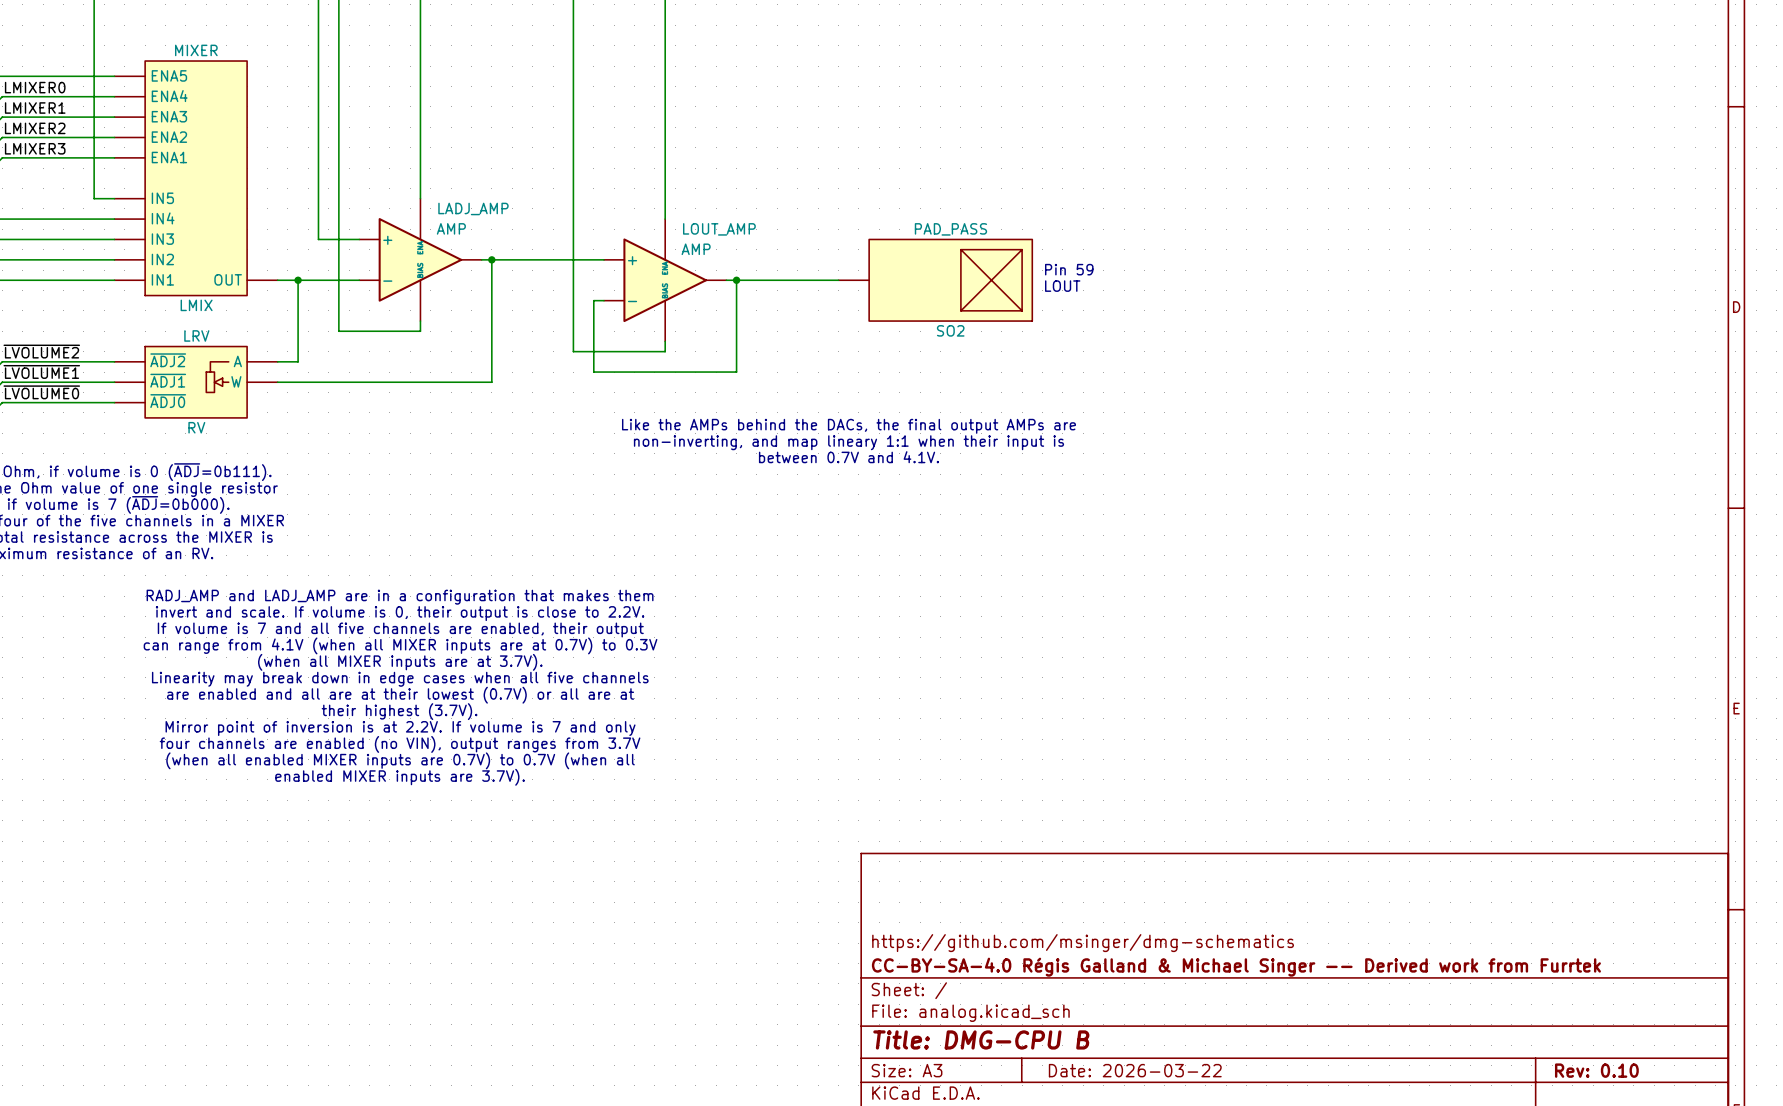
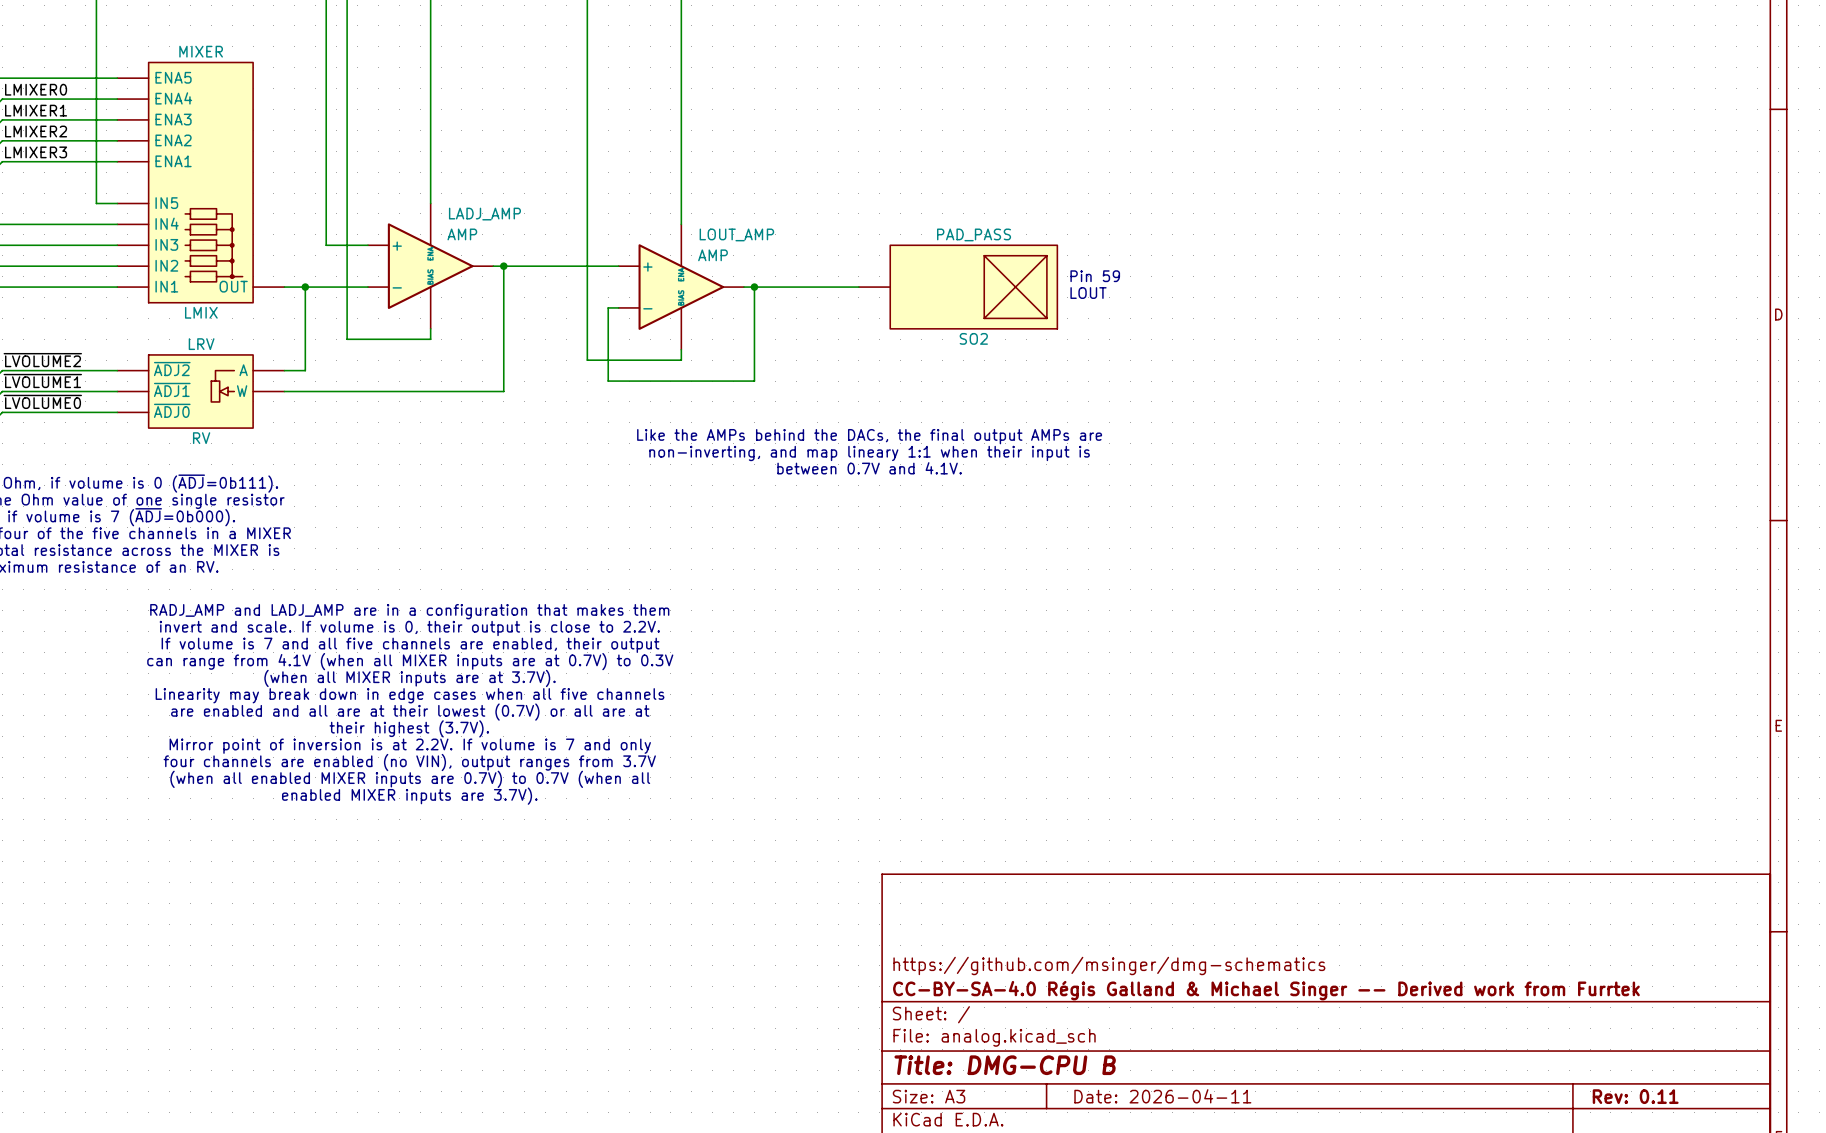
LMIX symbol: [114, 61, 278, 296] -> [117, 62, 285, 303]
title block: Date: 2026-03-22 (1135, 1070) -> Date: 2026-04-11 (1162, 1096)
title block: Rev: 0.10 (1596, 1070) -> Rev: 0.11 (1635, 1096)

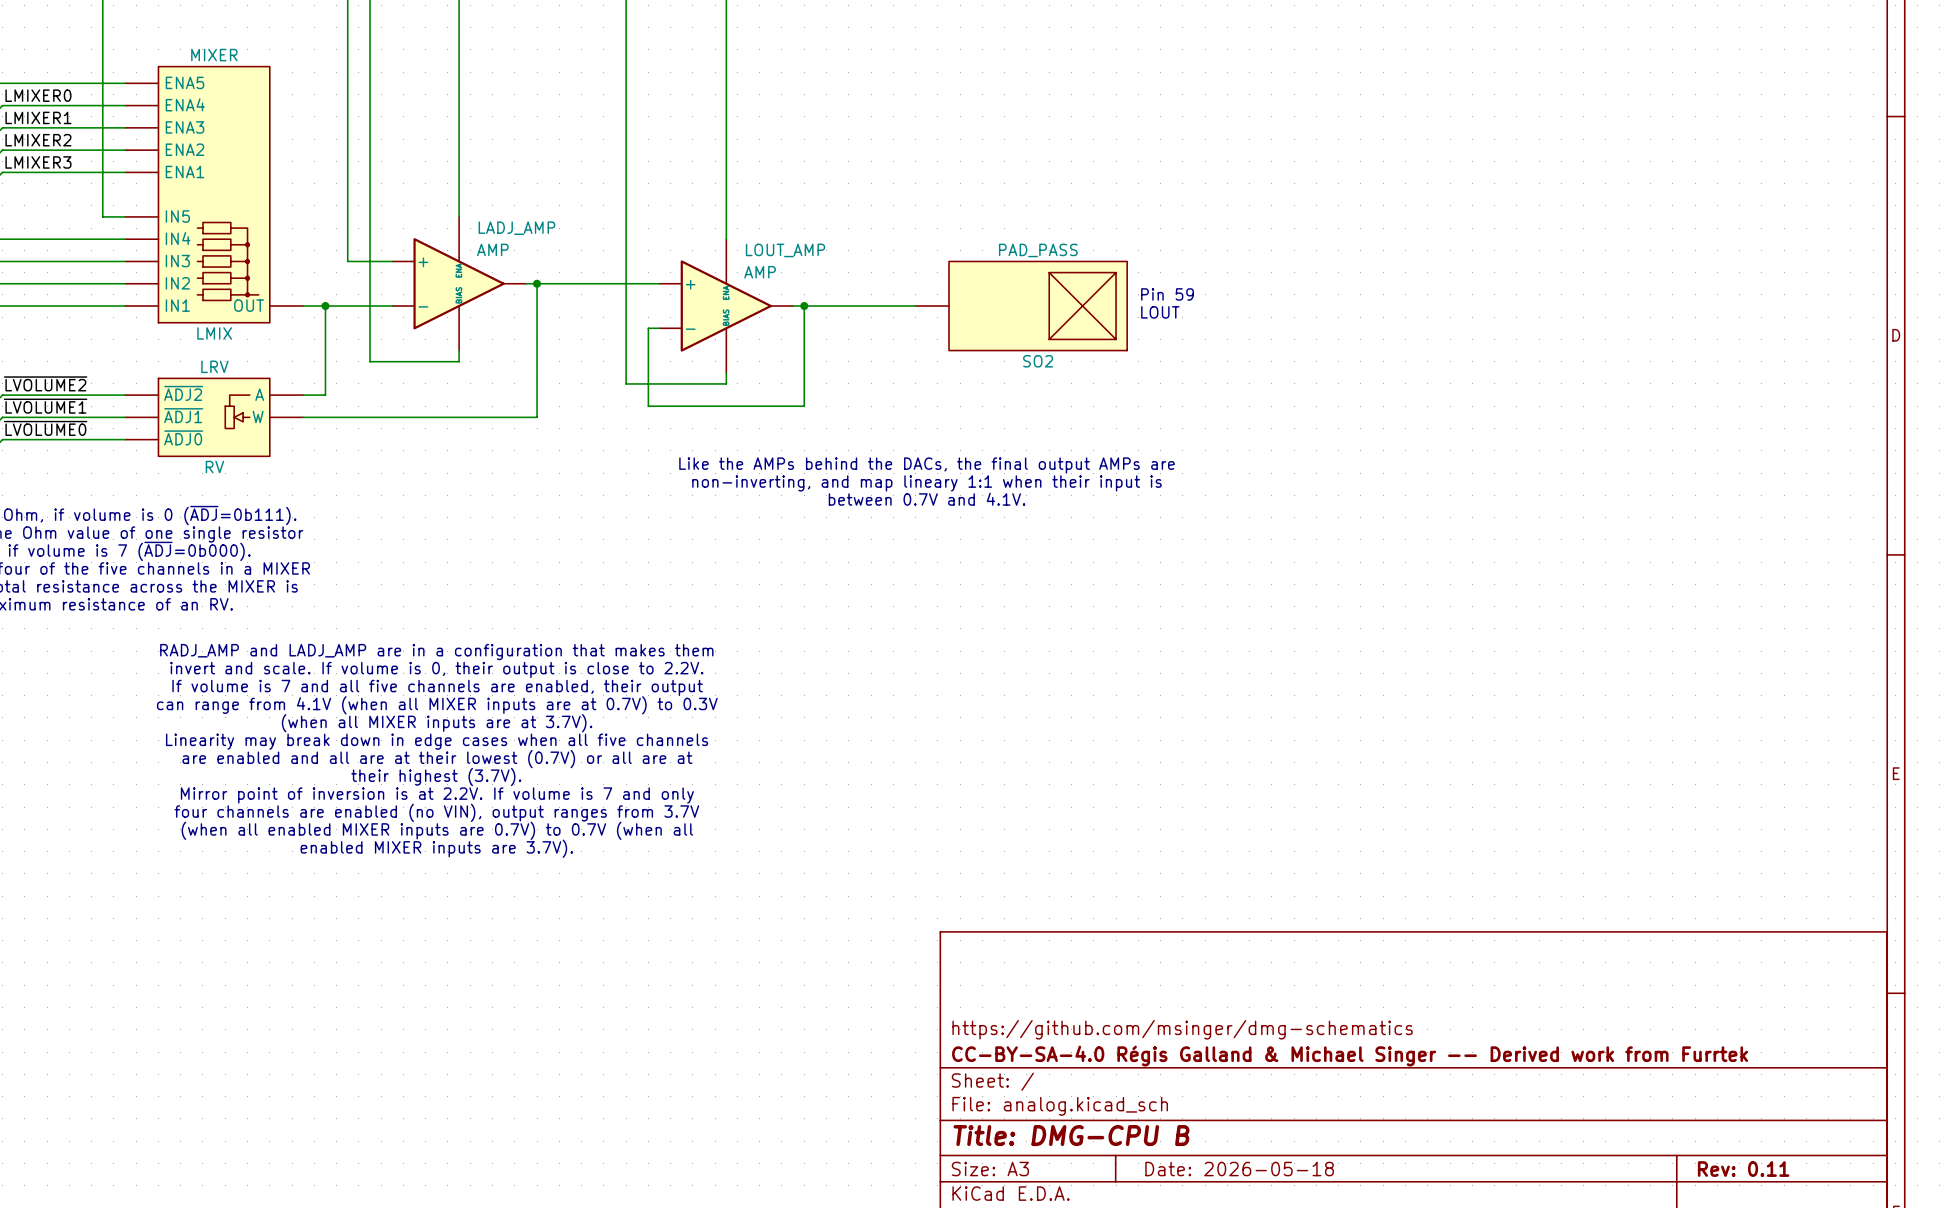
title block: Date: 2026-04-11 (1162, 1096) -> Date: 2026-05-18 (1239, 1169)

